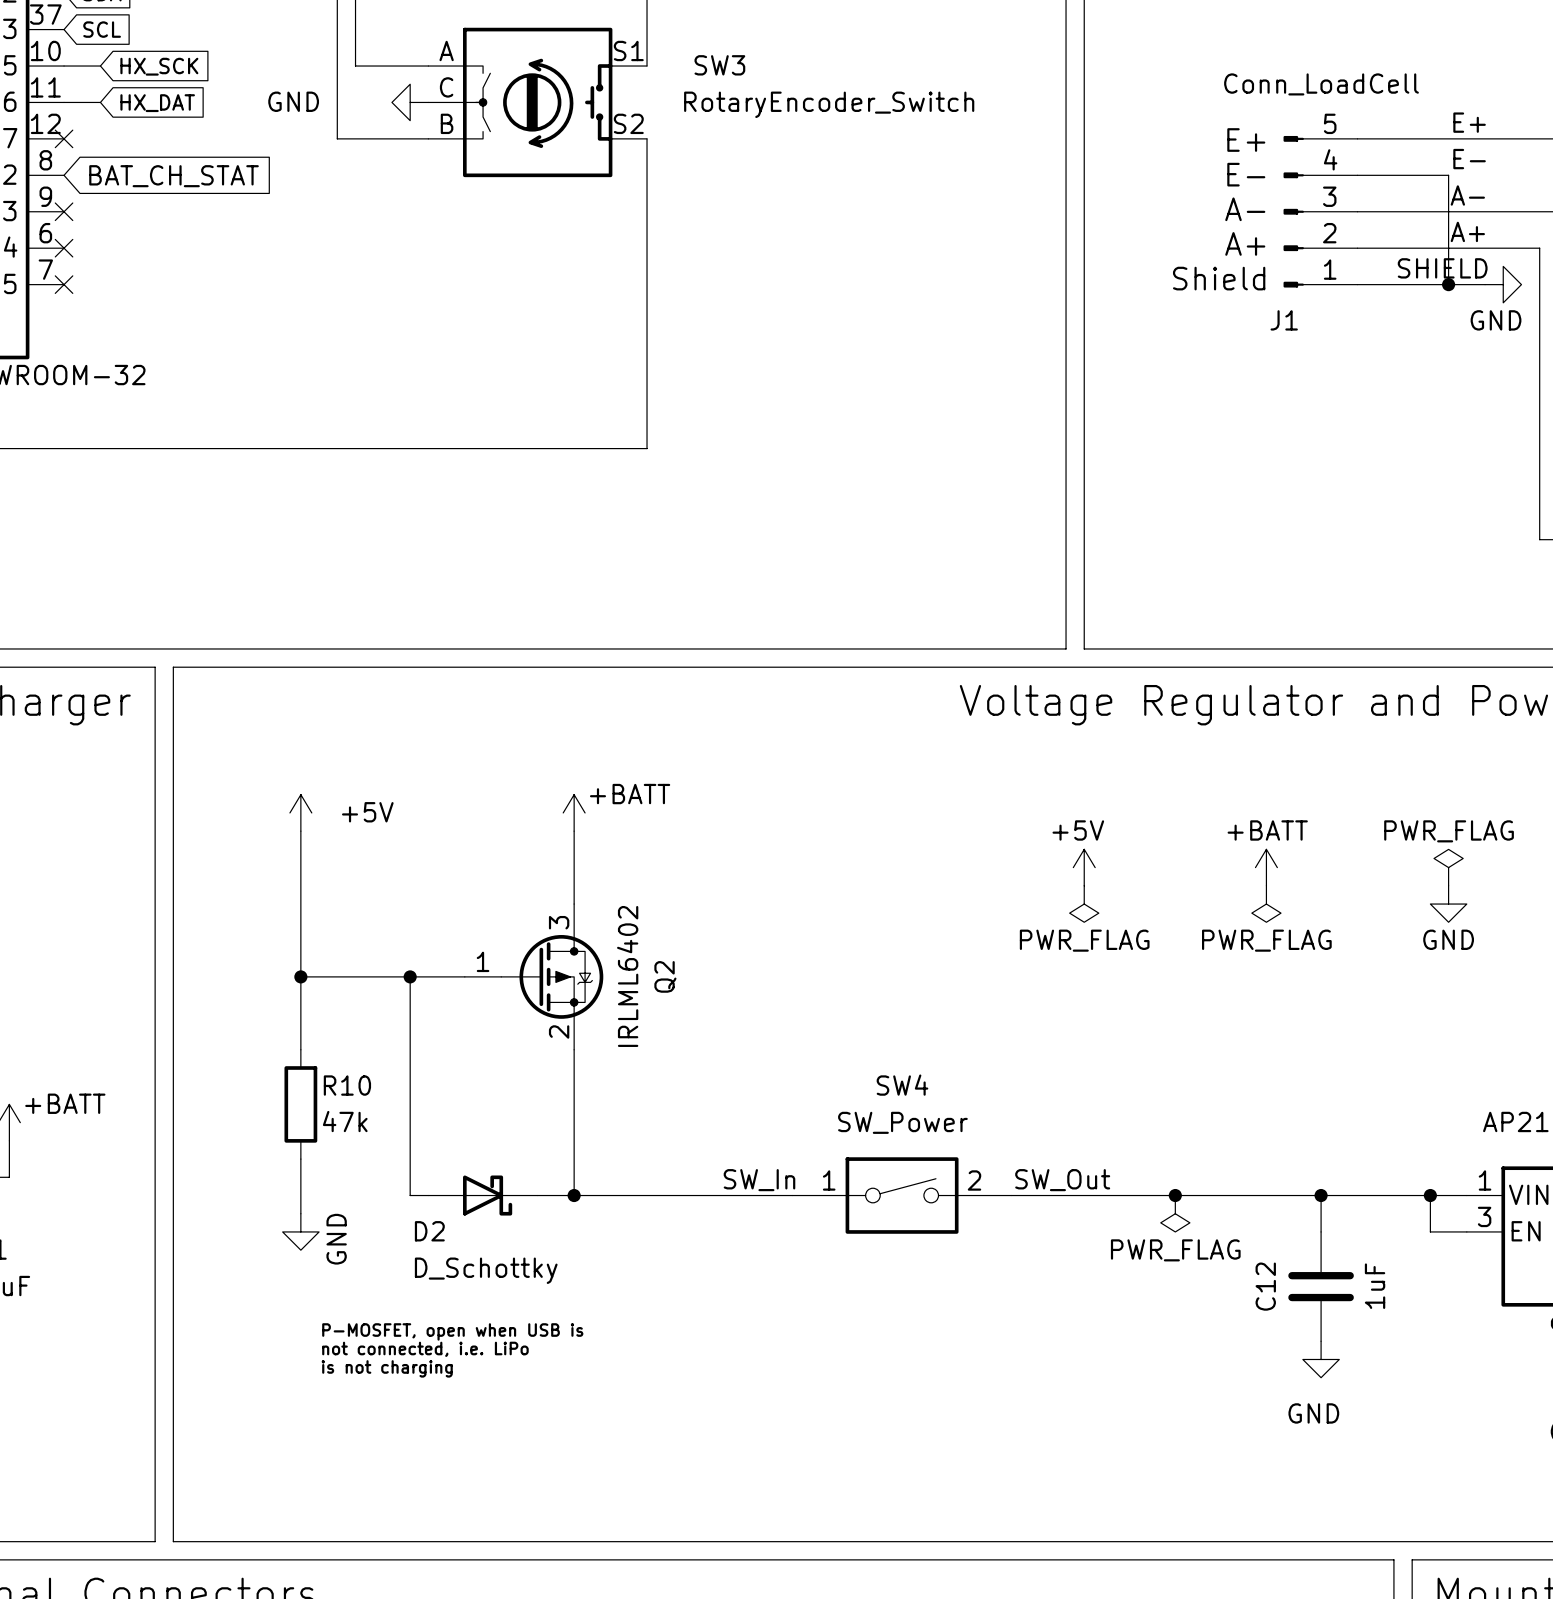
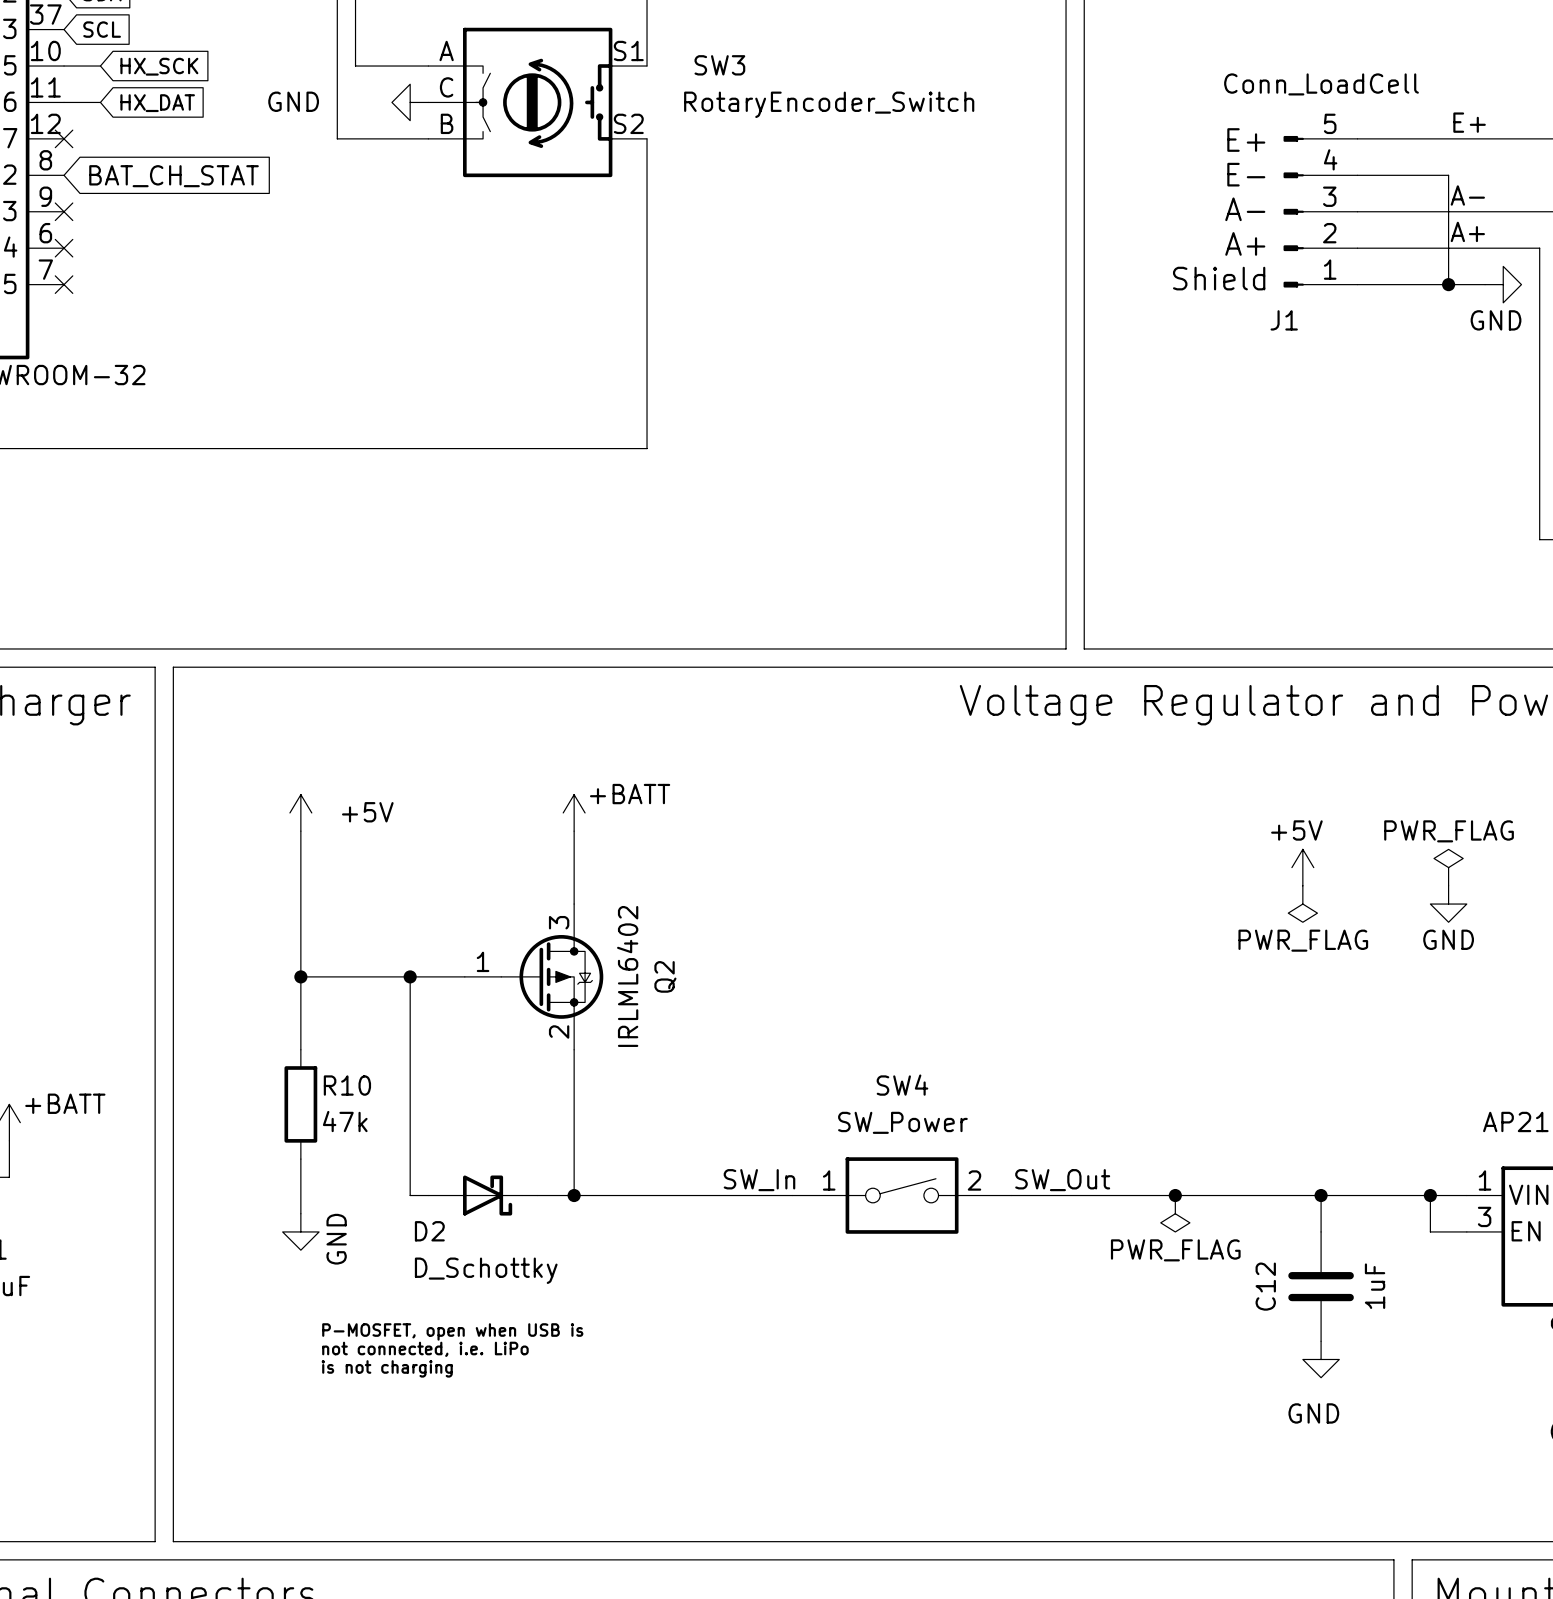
label: E- (1469, 159) -> none
label: SHIELD (1442, 268) -> none
power symbol position: +5V (1084, 867) -> +5V (1302, 867)
power symbol: +BATT (1266, 867) -> none
power symbol: PWR_FLAG (1084, 904) -> none
power symbol position: PWR_FLAG (1266, 904) -> PWR_FLAG (1302, 904)

